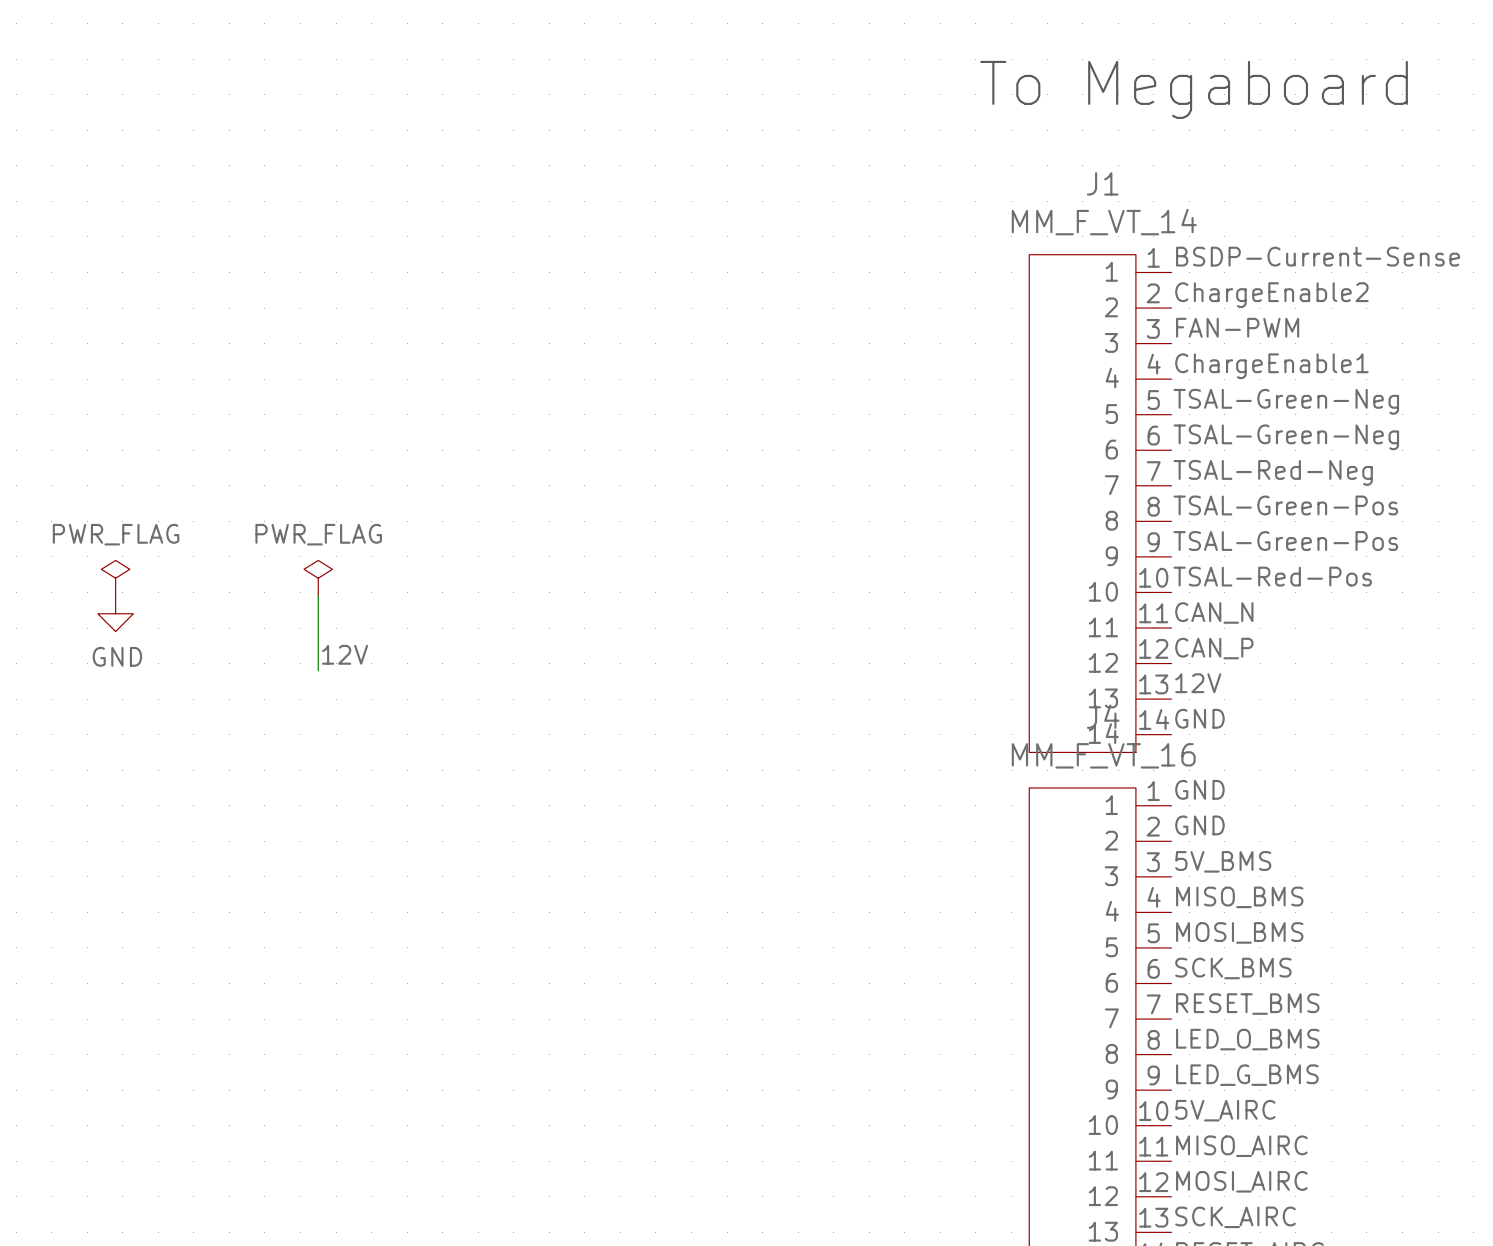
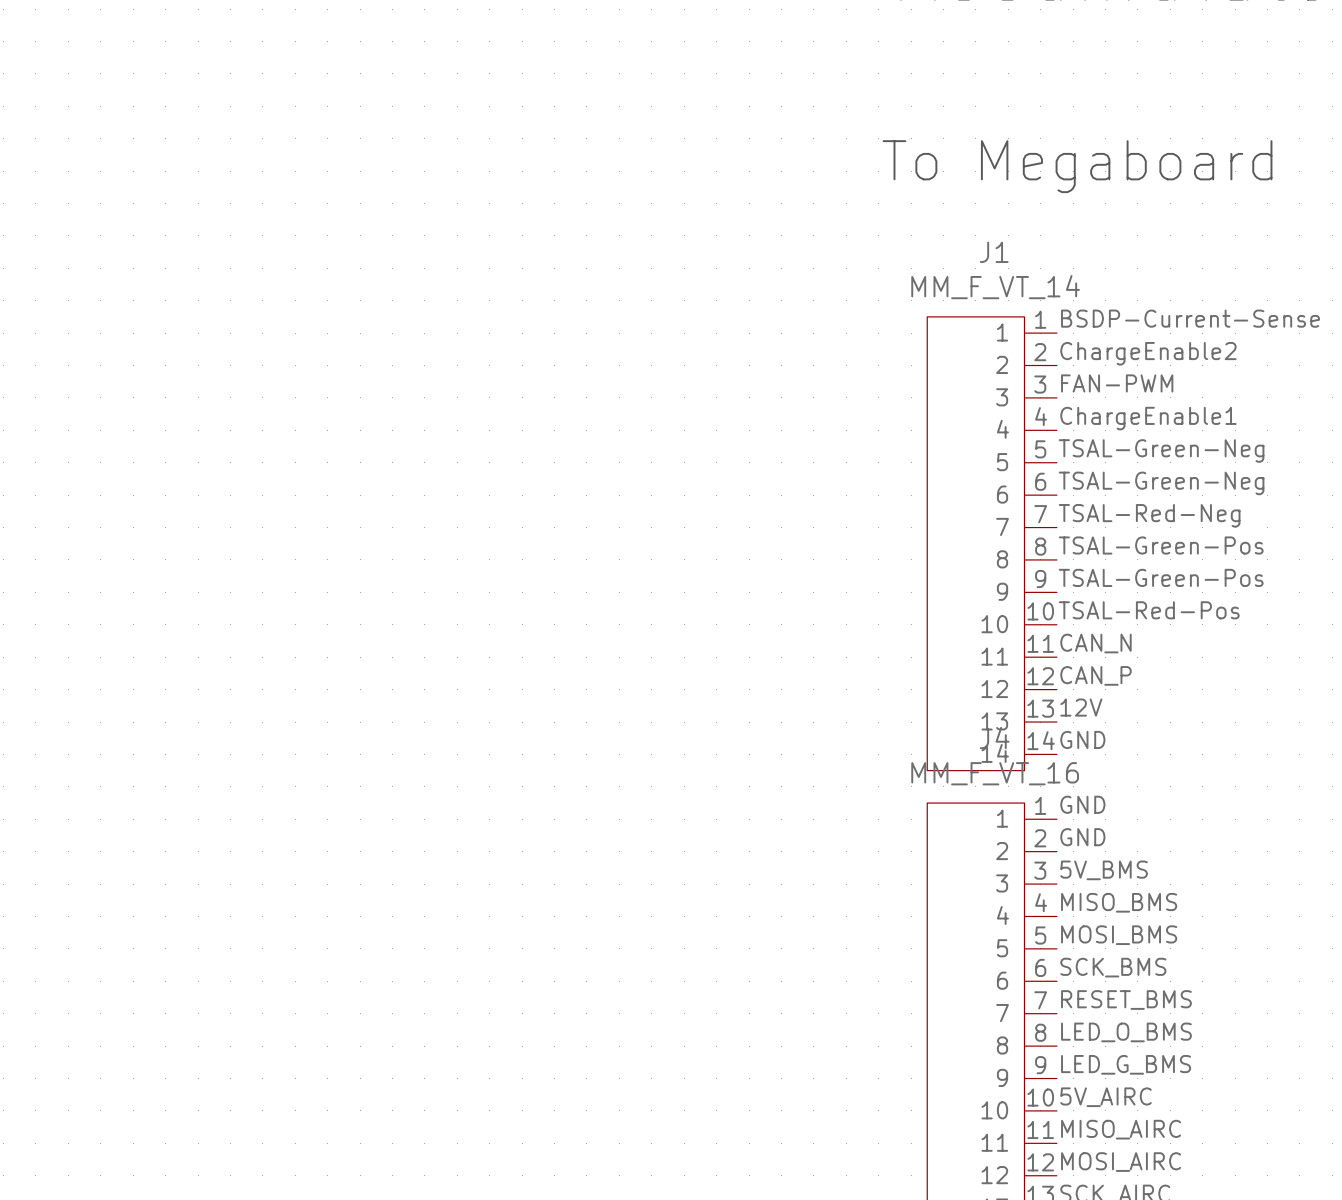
power symbol: PWR_FLAG (115, 578) -> none
power symbol: PWR_FLAG (318, 578) -> none
wire: (318, 596) (318, 670) -> none
power symbol: GND (115, 613) -> none
label: 12V (345, 654) -> none

